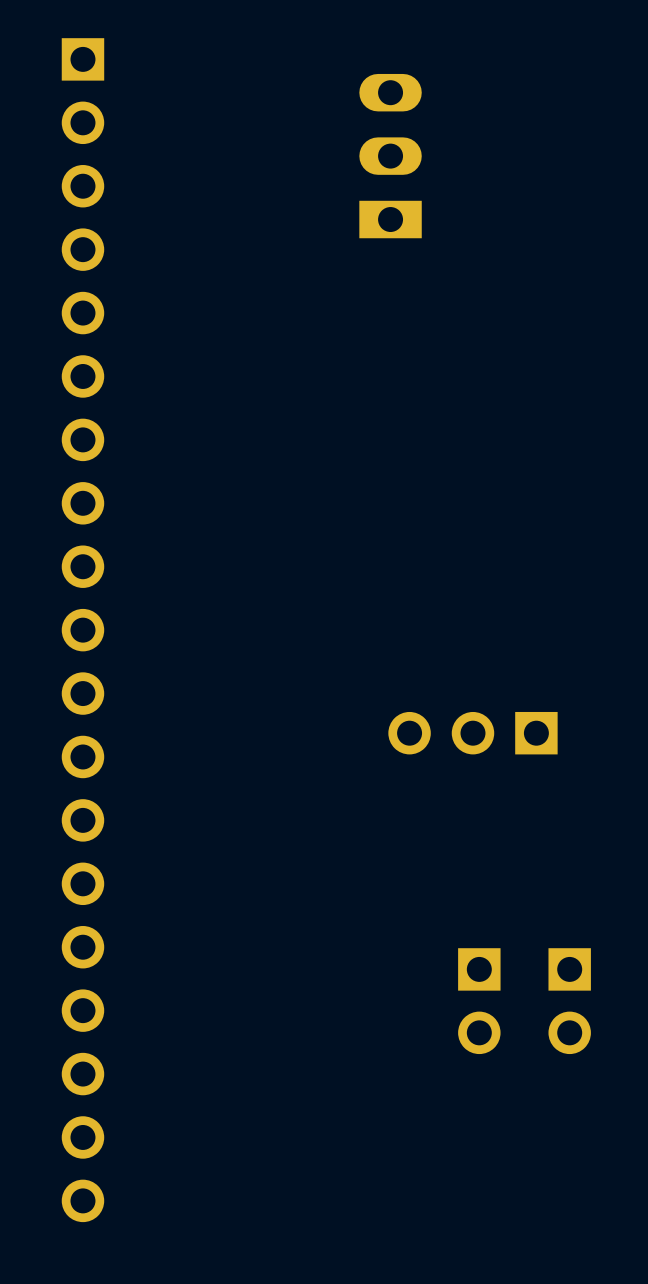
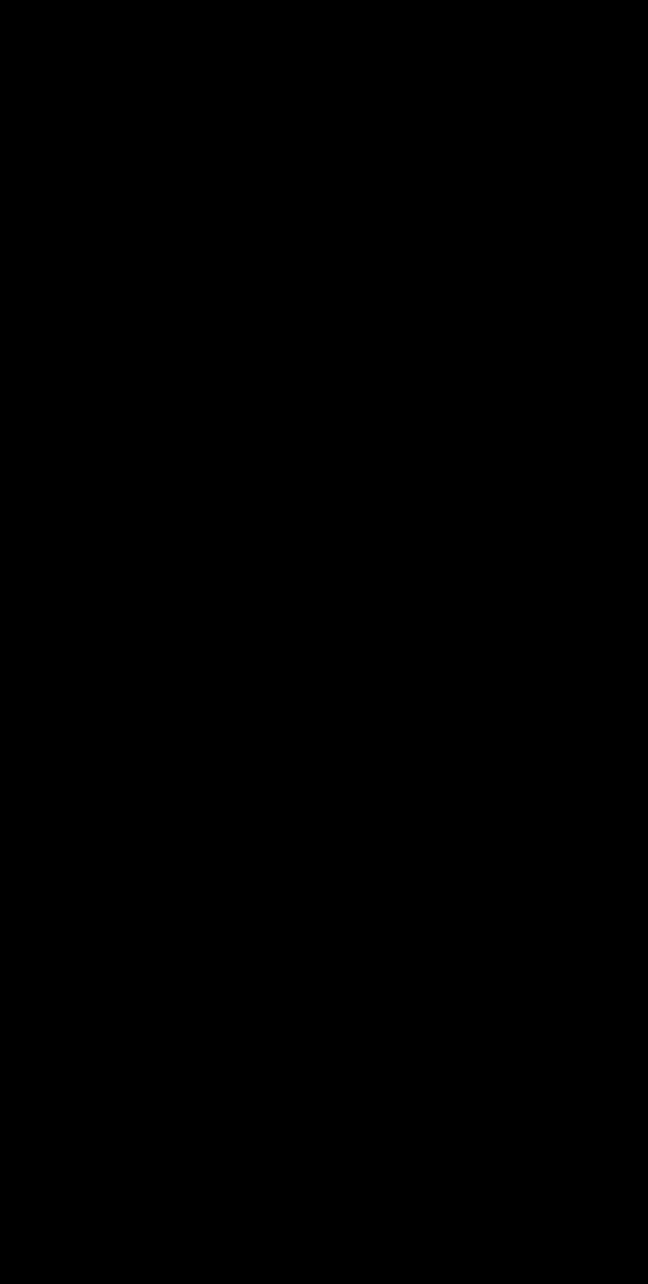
part: (390, 156) -> none
part: (82, 630) -> none
part: (472, 733) -> none
part: (479, 1001) -> none
part: (569, 1001) -> none

